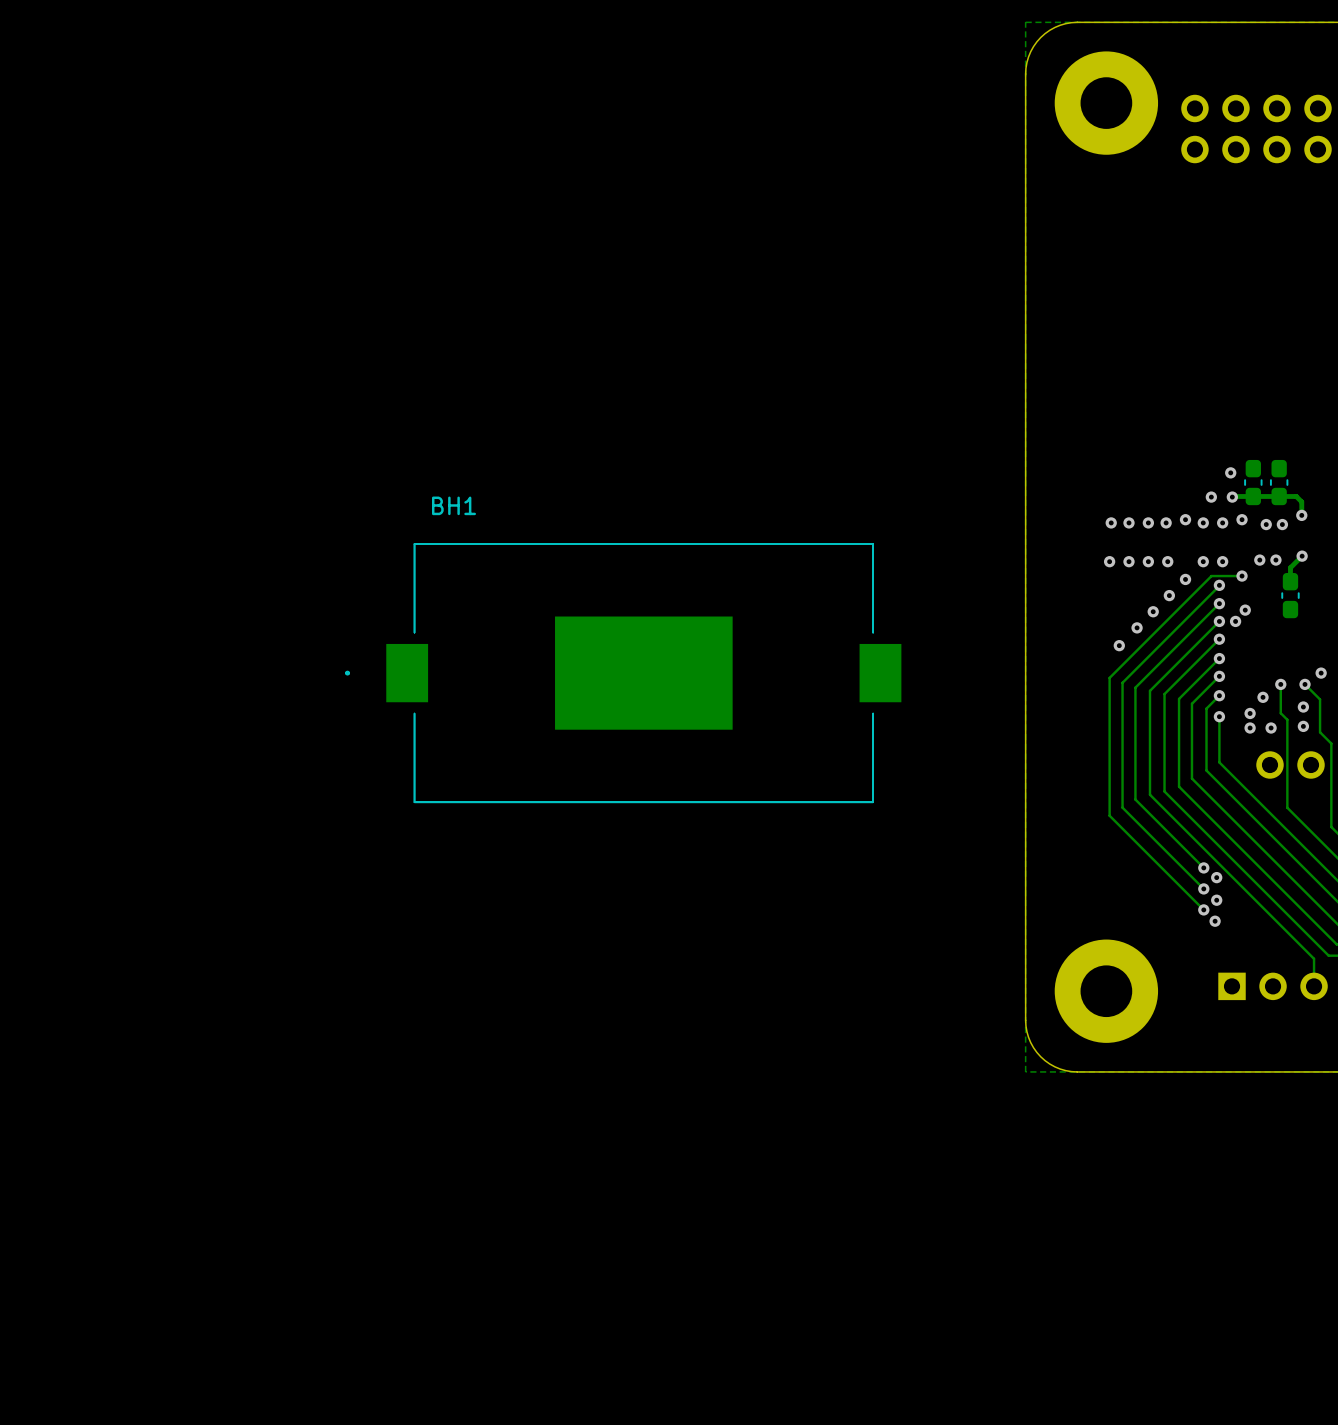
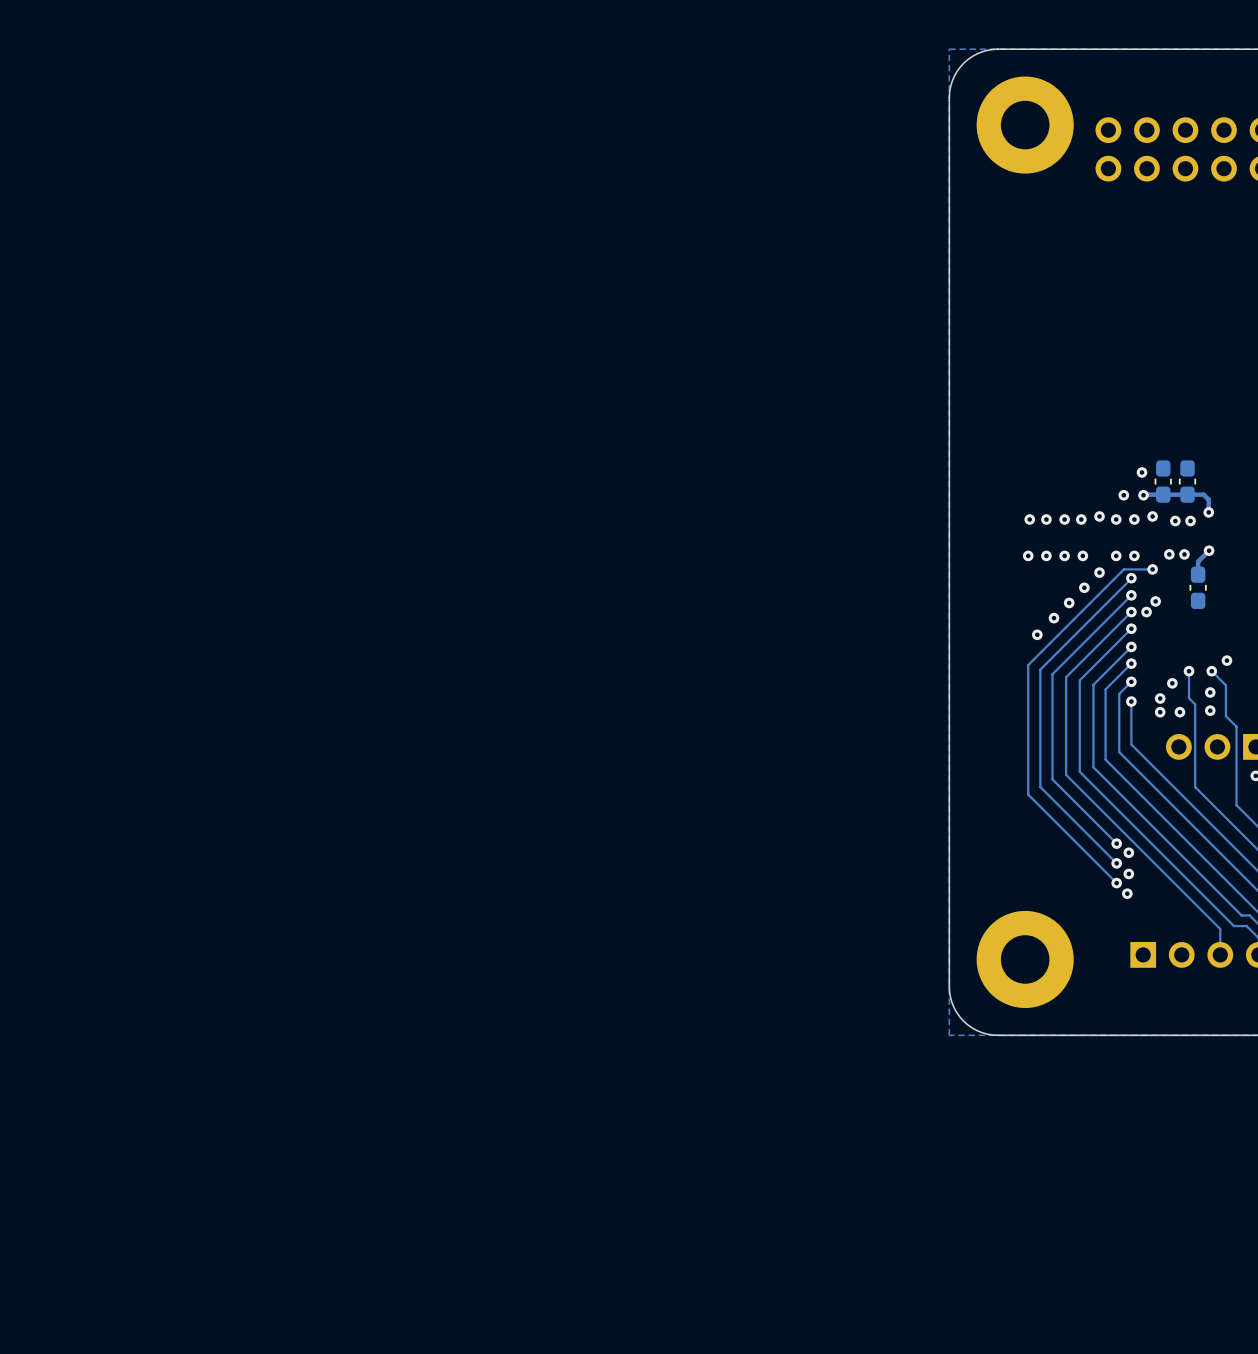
BH1: (623, 673) -> none

